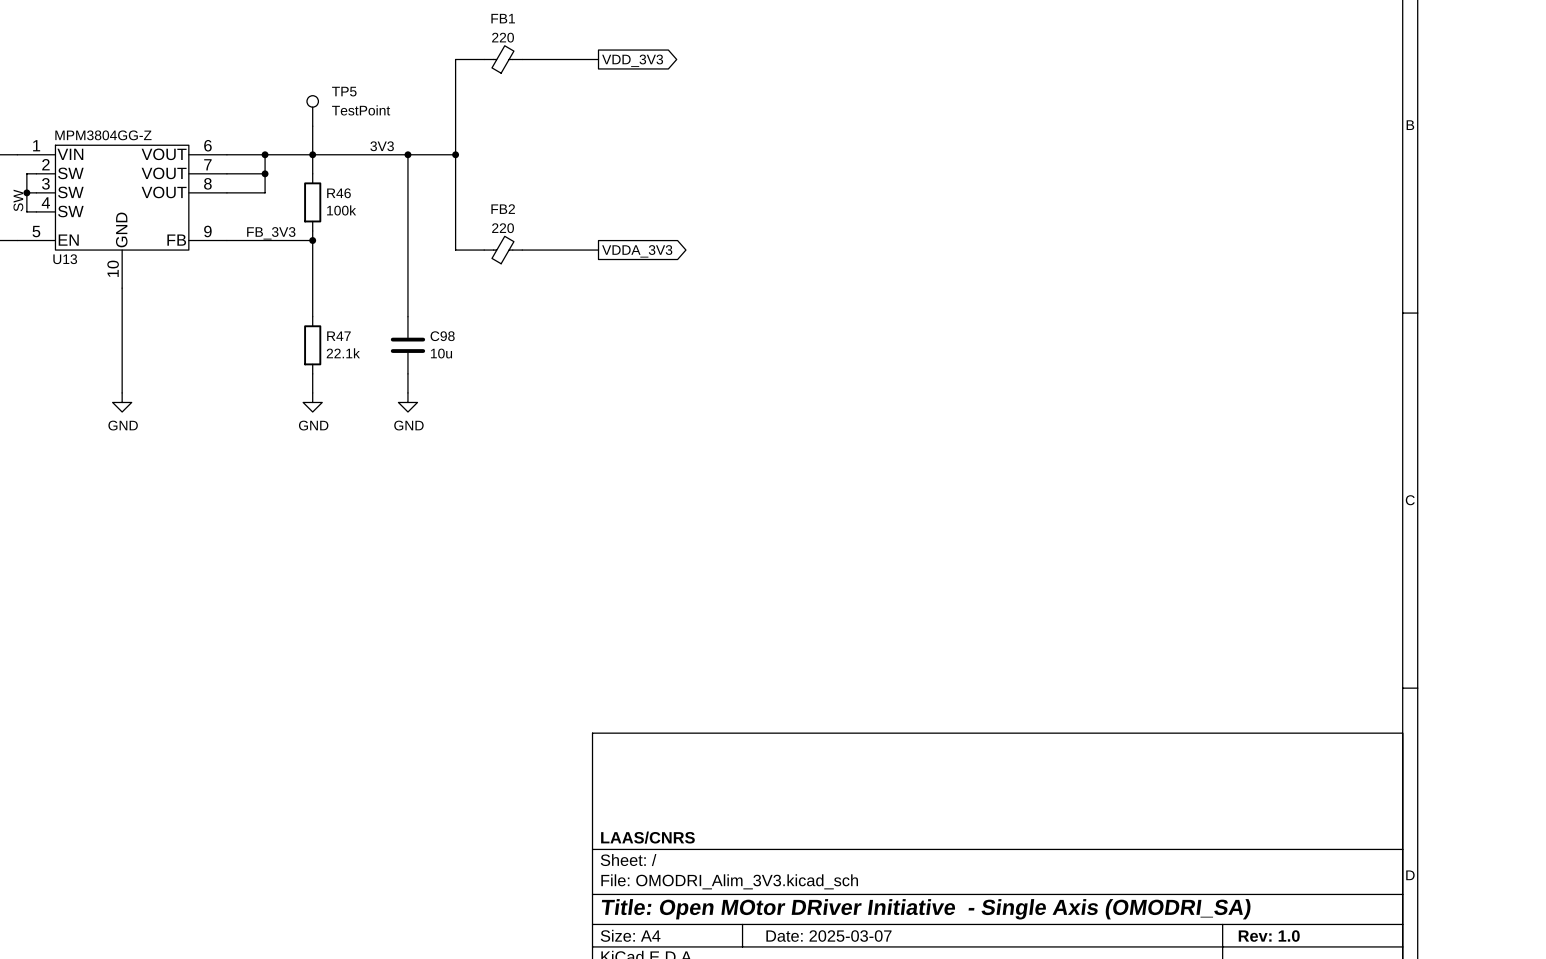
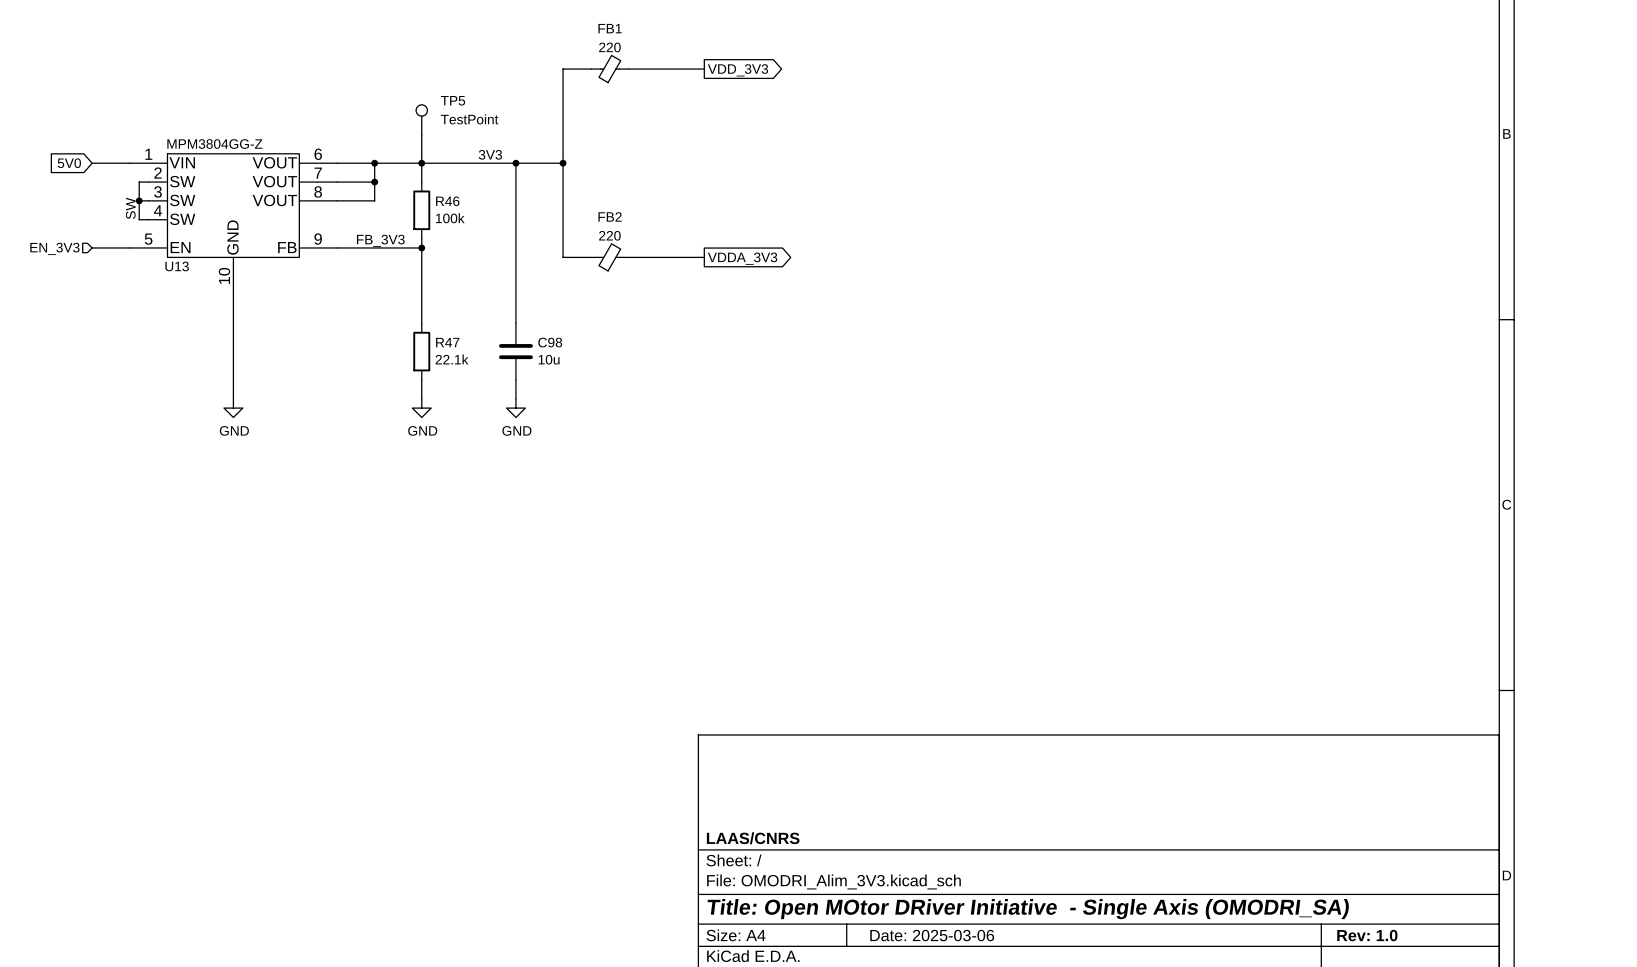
title block: Date: 2025-03-07 (828, 936) -> Date: 2025-03-06 (932, 935)

